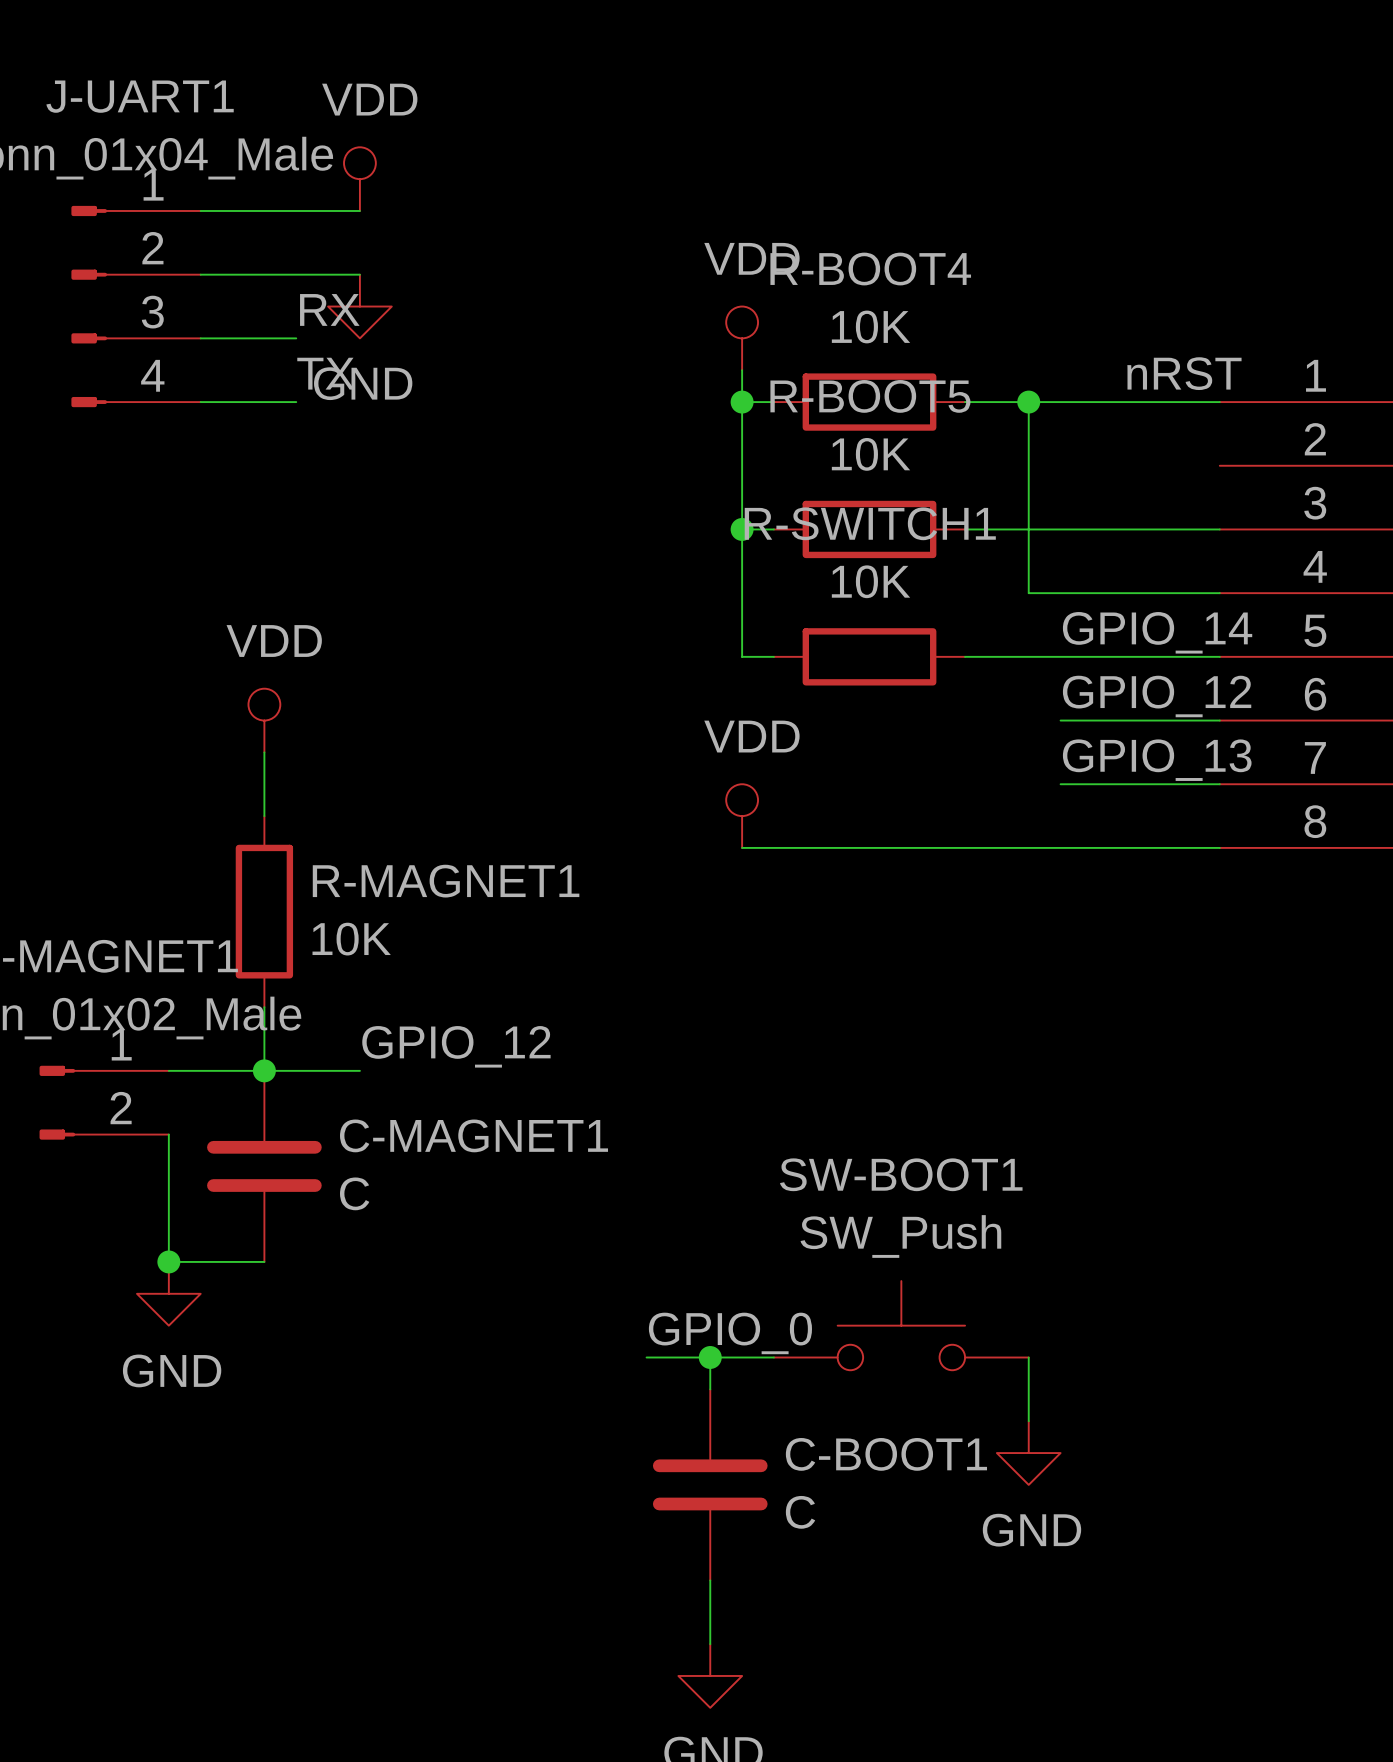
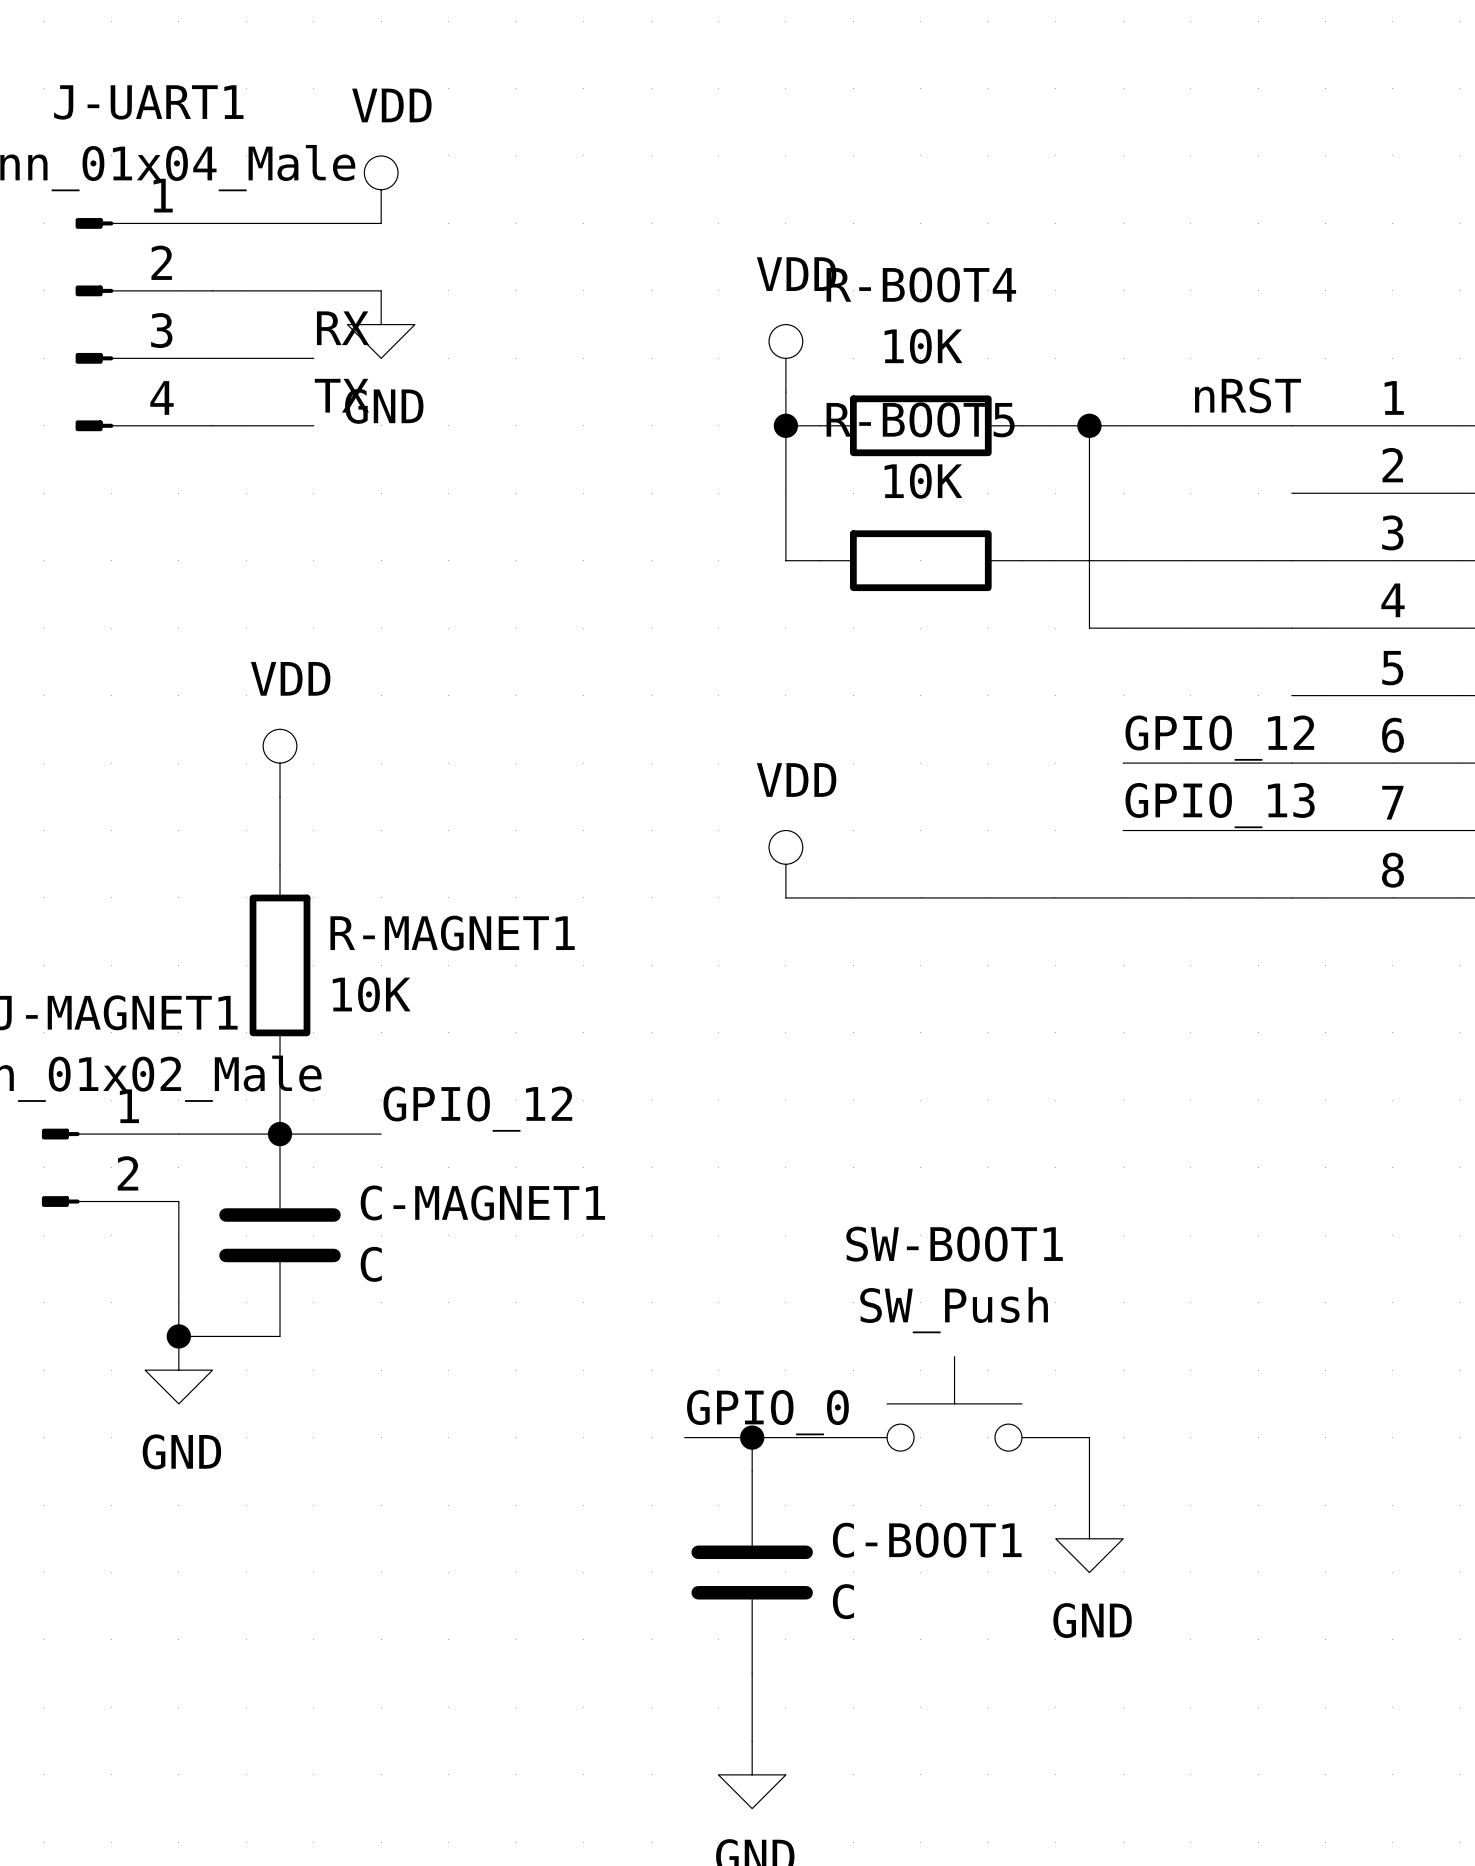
wire: (742, 529) (742, 656) (773, 656) -> none
junction: (742, 529) -> none
label: GPIO_14 (1157, 632) -> none
R-SWITCH1: 10K (869, 656) -> none
wire: (965, 656) (1219, 656) -> none

